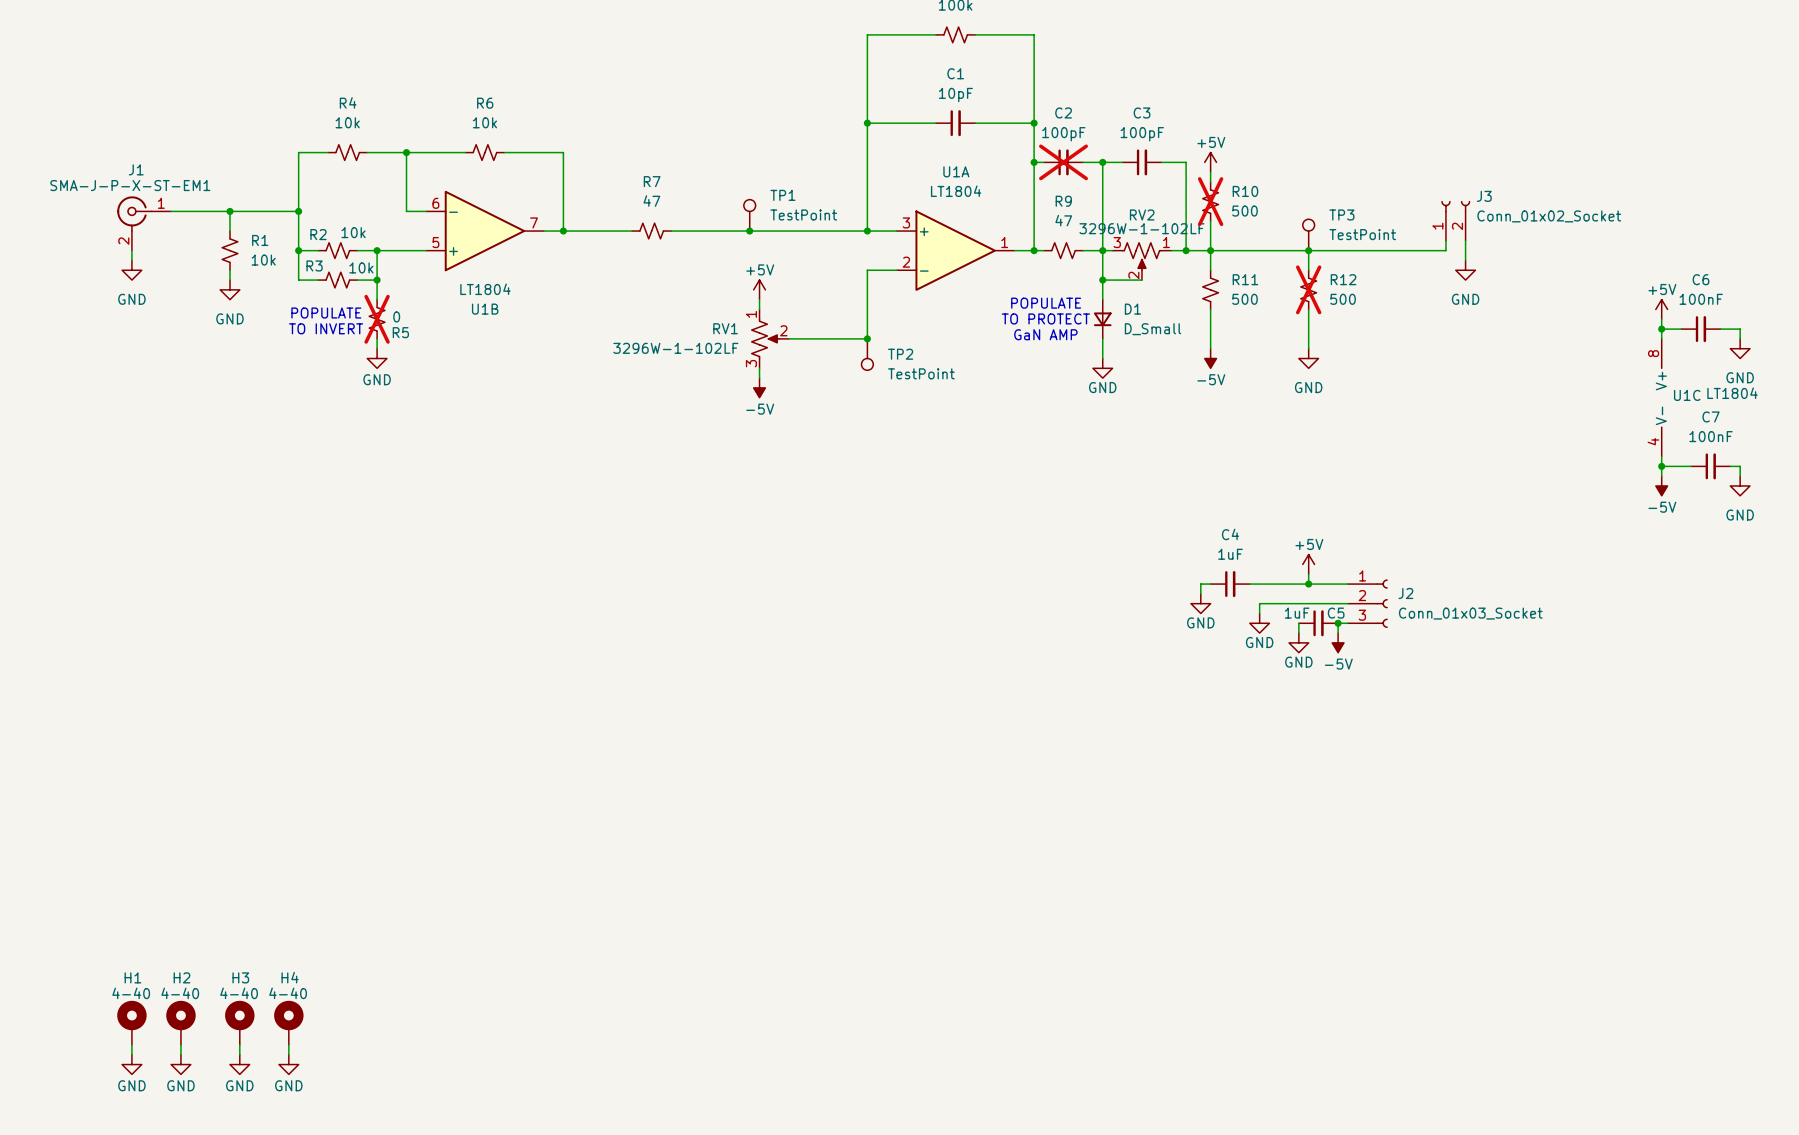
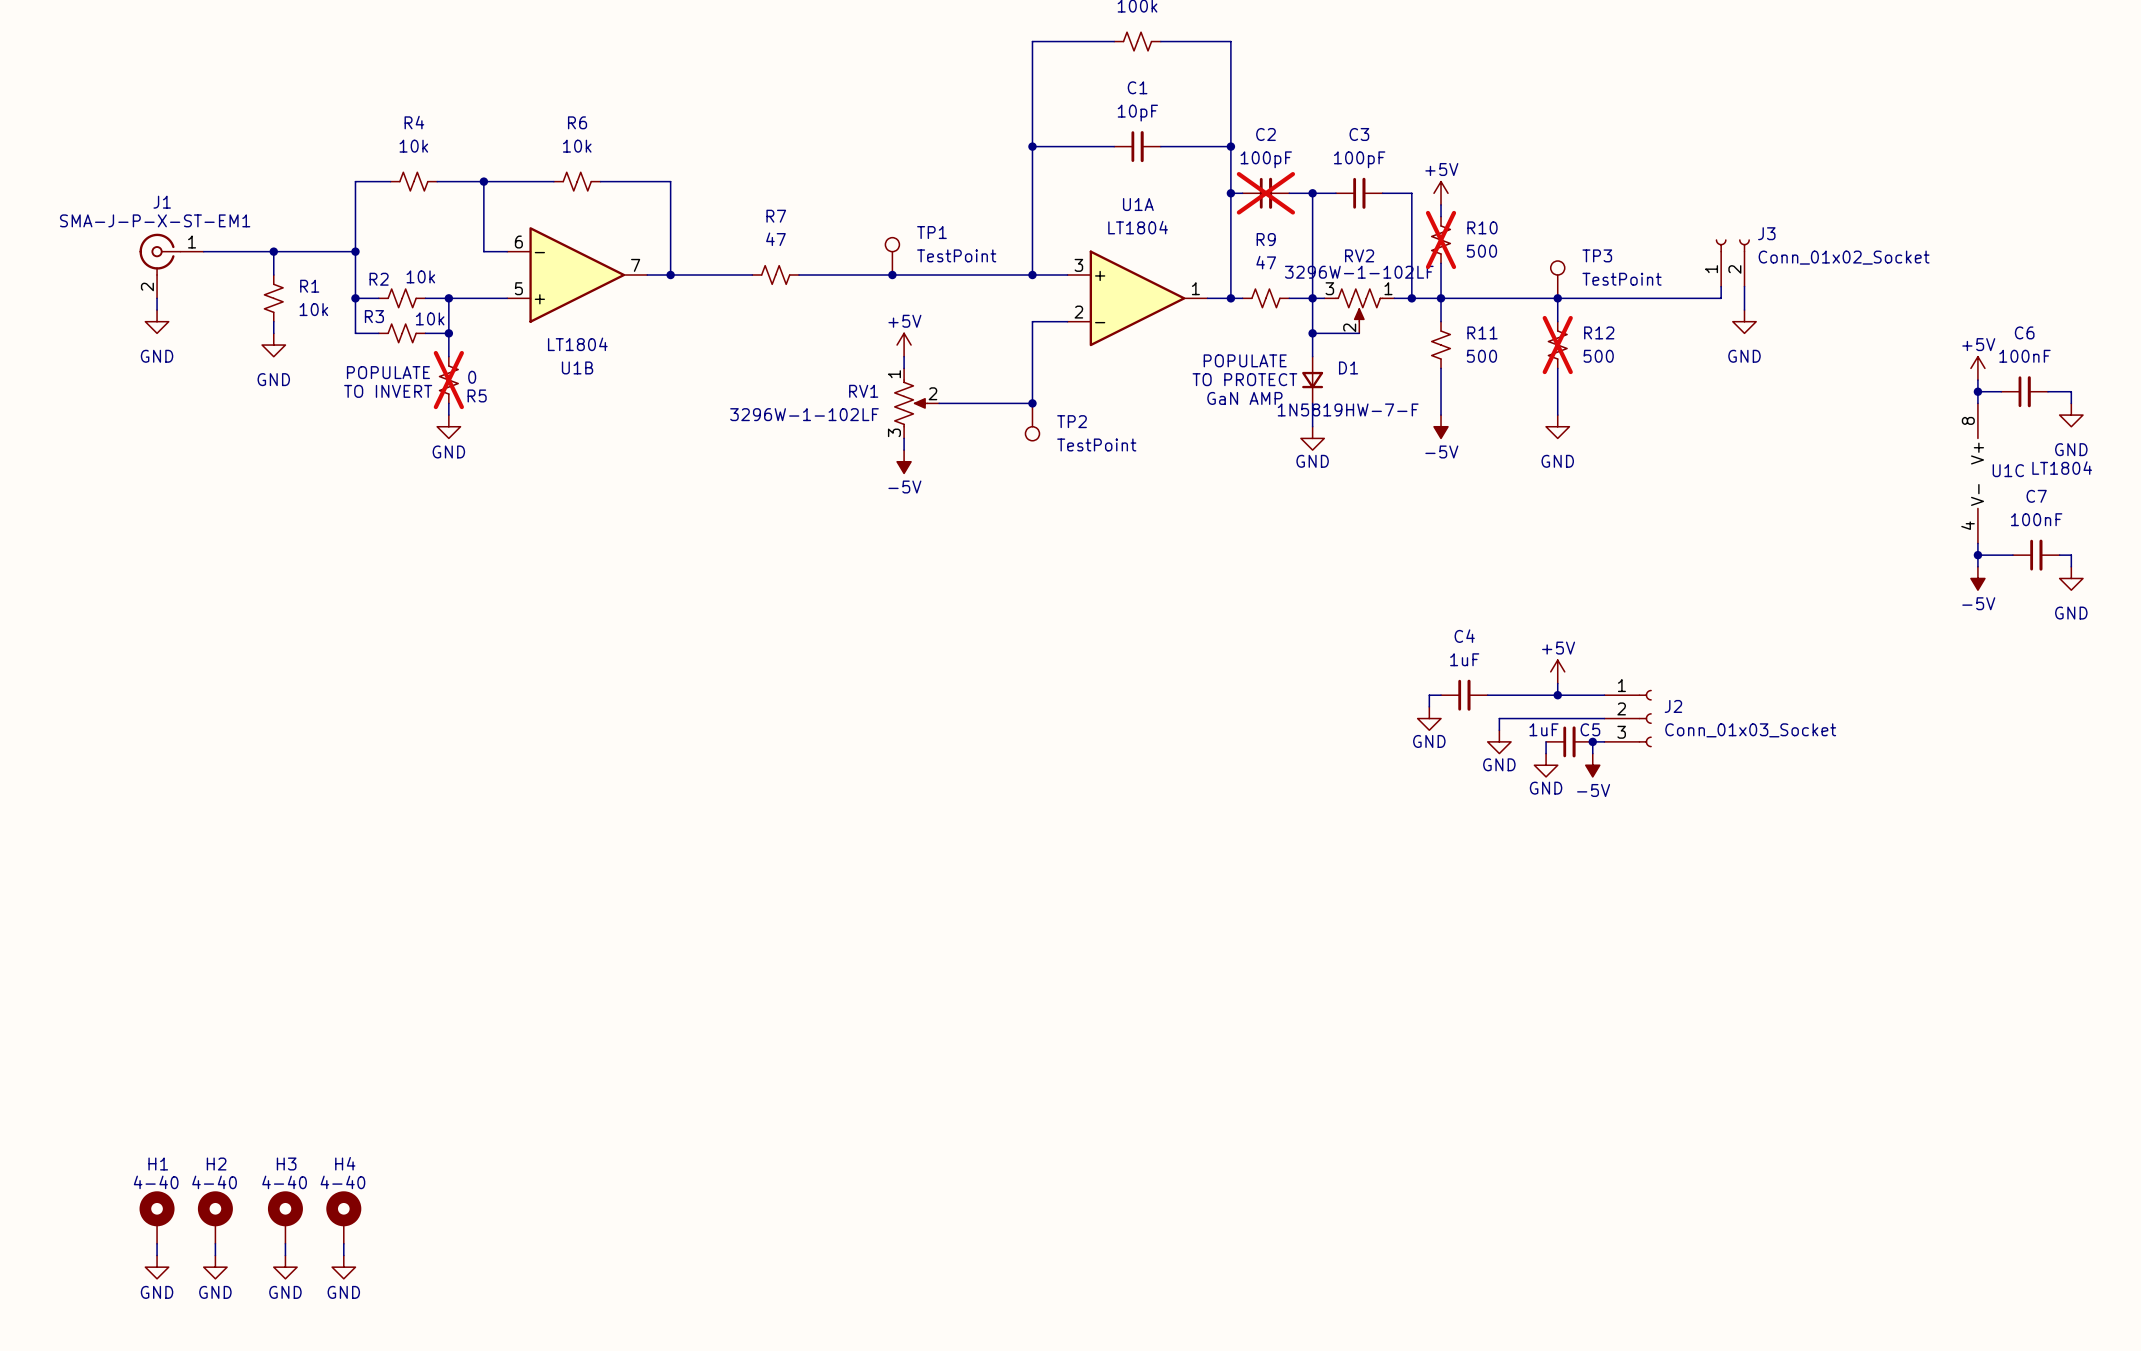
D1 value: D_Small (1153, 329) -> 1N5819HW-7-F (1348, 409)

